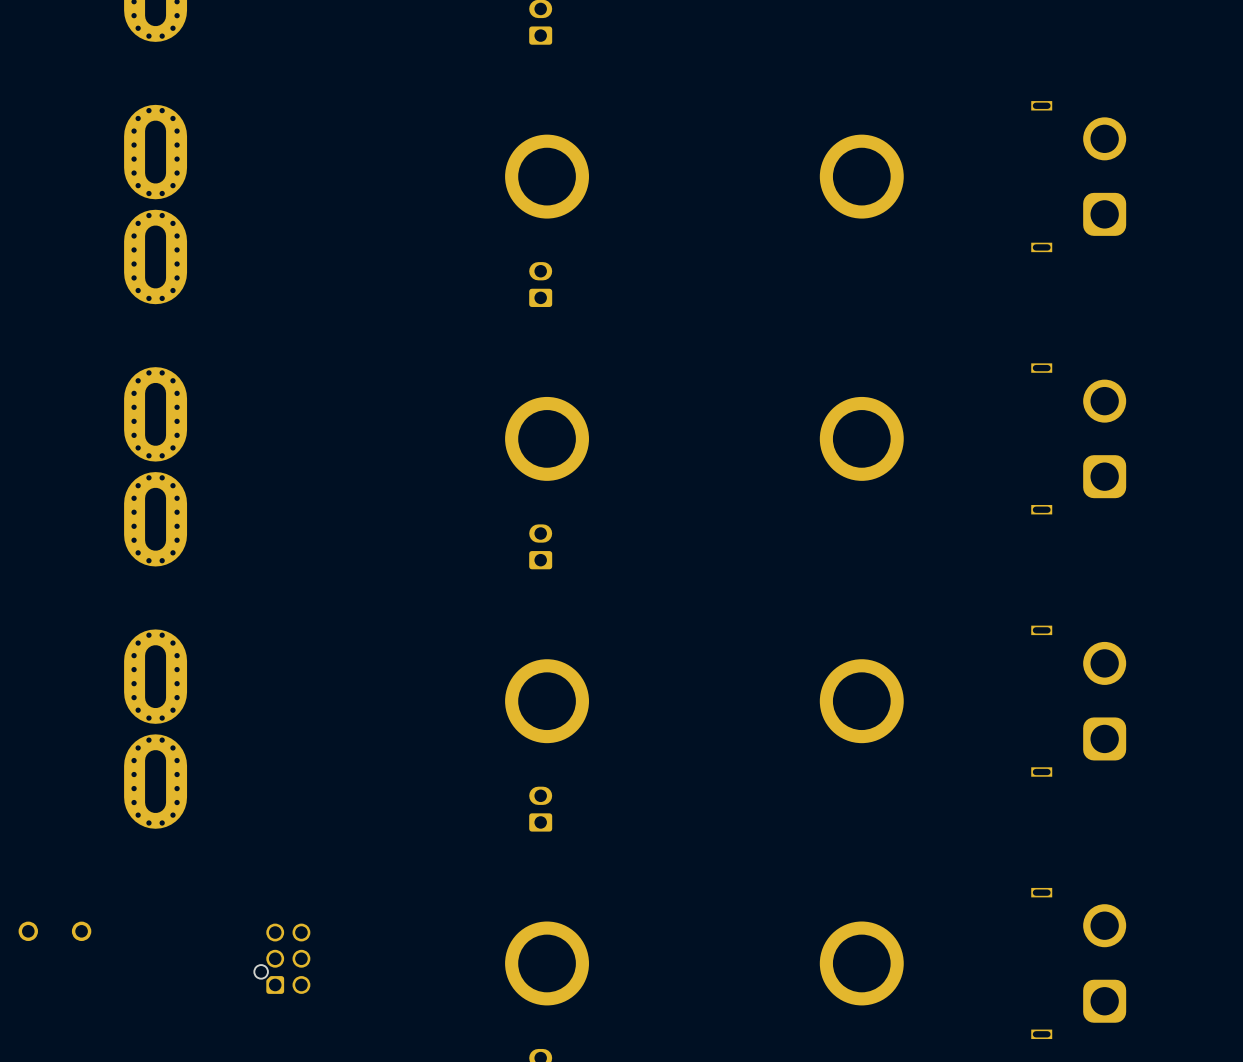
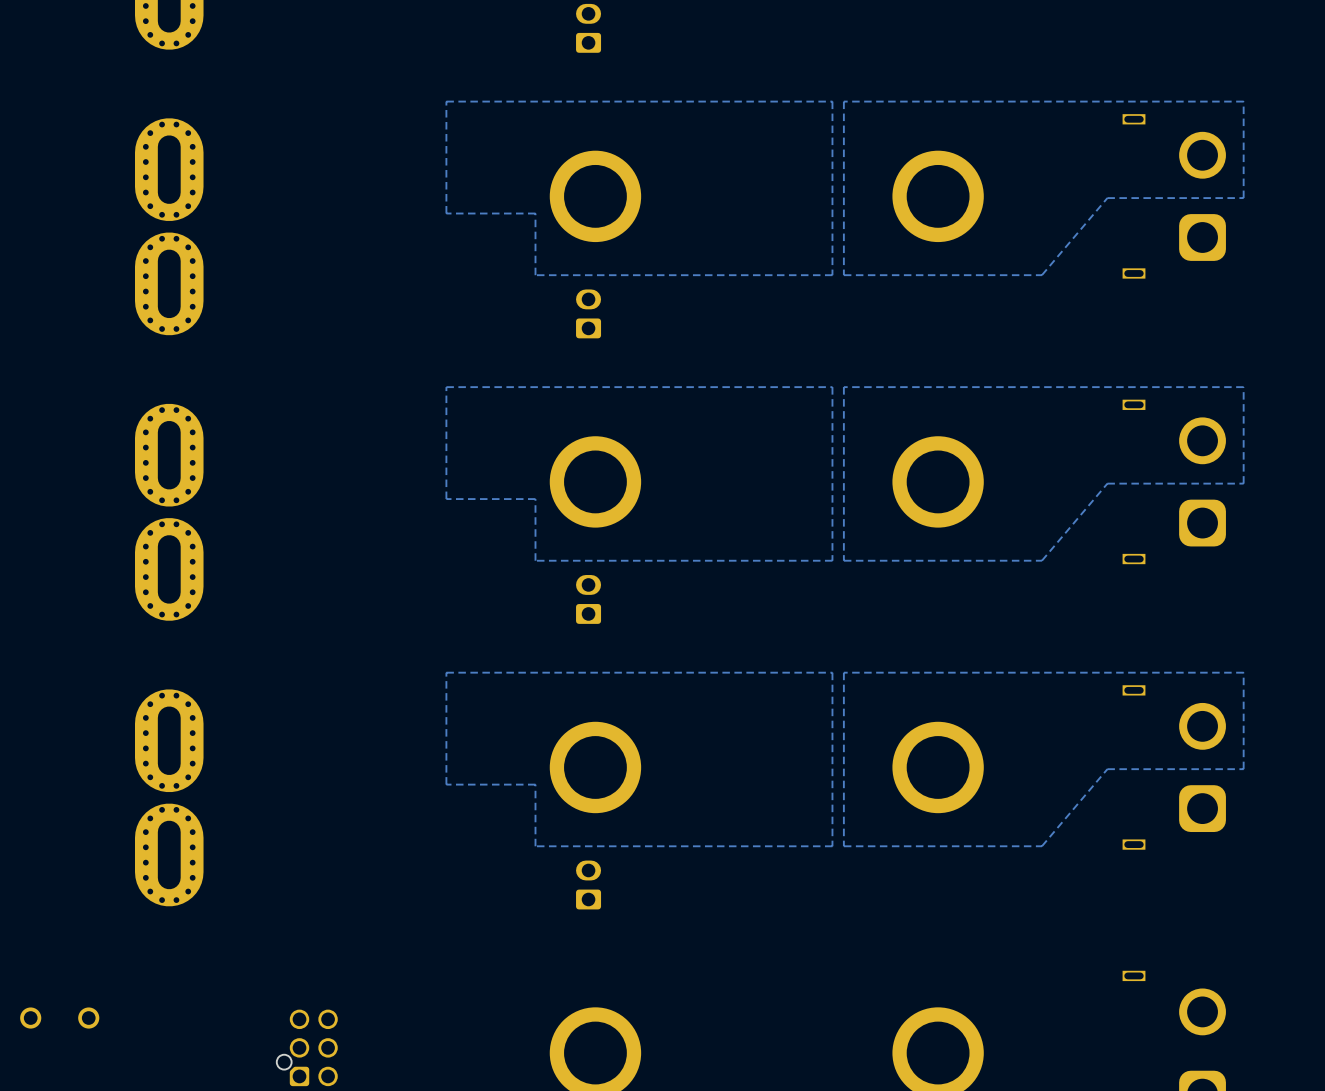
zone outline: none -> (832, 101) (832, 275) (535, 275) (535, 213) (446, 213) (446, 101) (832, 101)
zone outline: none -> (1243, 101) (1243, 198) (1107, 198) (1041, 275) (843, 275) (843, 101) (1243, 101)
zone outline: none -> (832, 387) (832, 560) (535, 560) (535, 499) (446, 499) (446, 387) (832, 387)
zone outline: none -> (1243, 387) (1243, 483) (1107, 483) (1041, 560) (843, 560) (843, 387) (1243, 387)
zone outline: none -> (832, 672) (446, 672) (446, 784) (535, 784) (535, 846) (832, 846) (832, 672)
zone outline: none -> (1243, 672) (843, 672) (843, 846) (1041, 846) (1107, 769) (1243, 769) (1243, 672)

